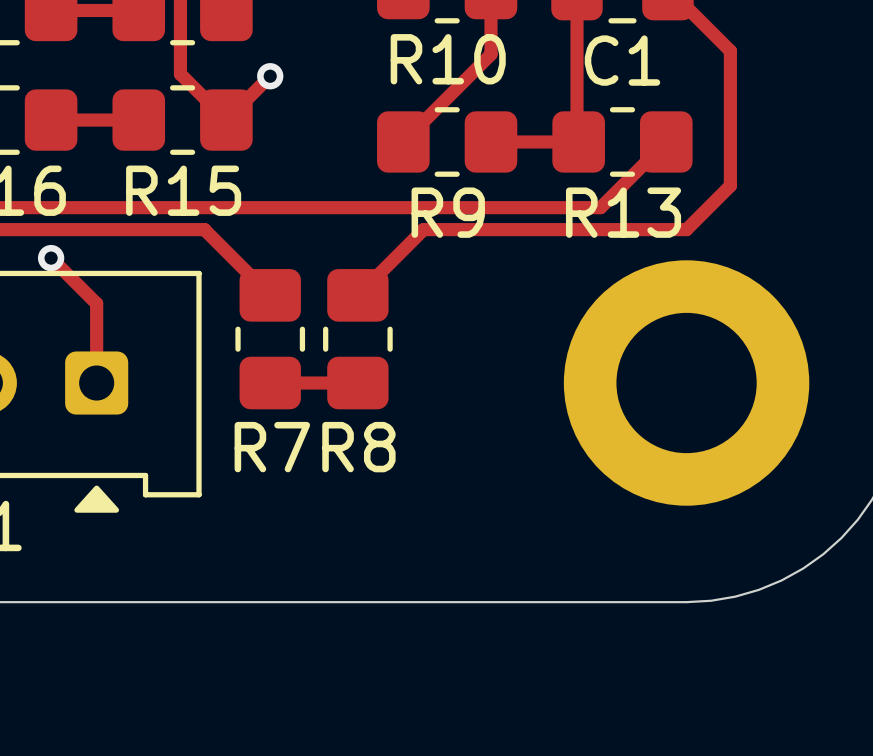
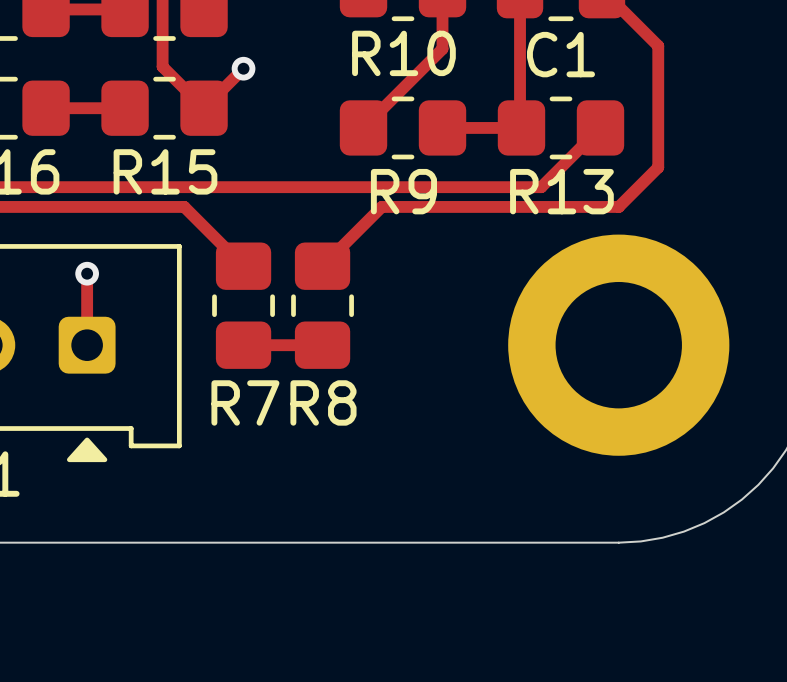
track: (51, 258) (96, 303) -> none
via position: (51, 258) -> (87, 273)

